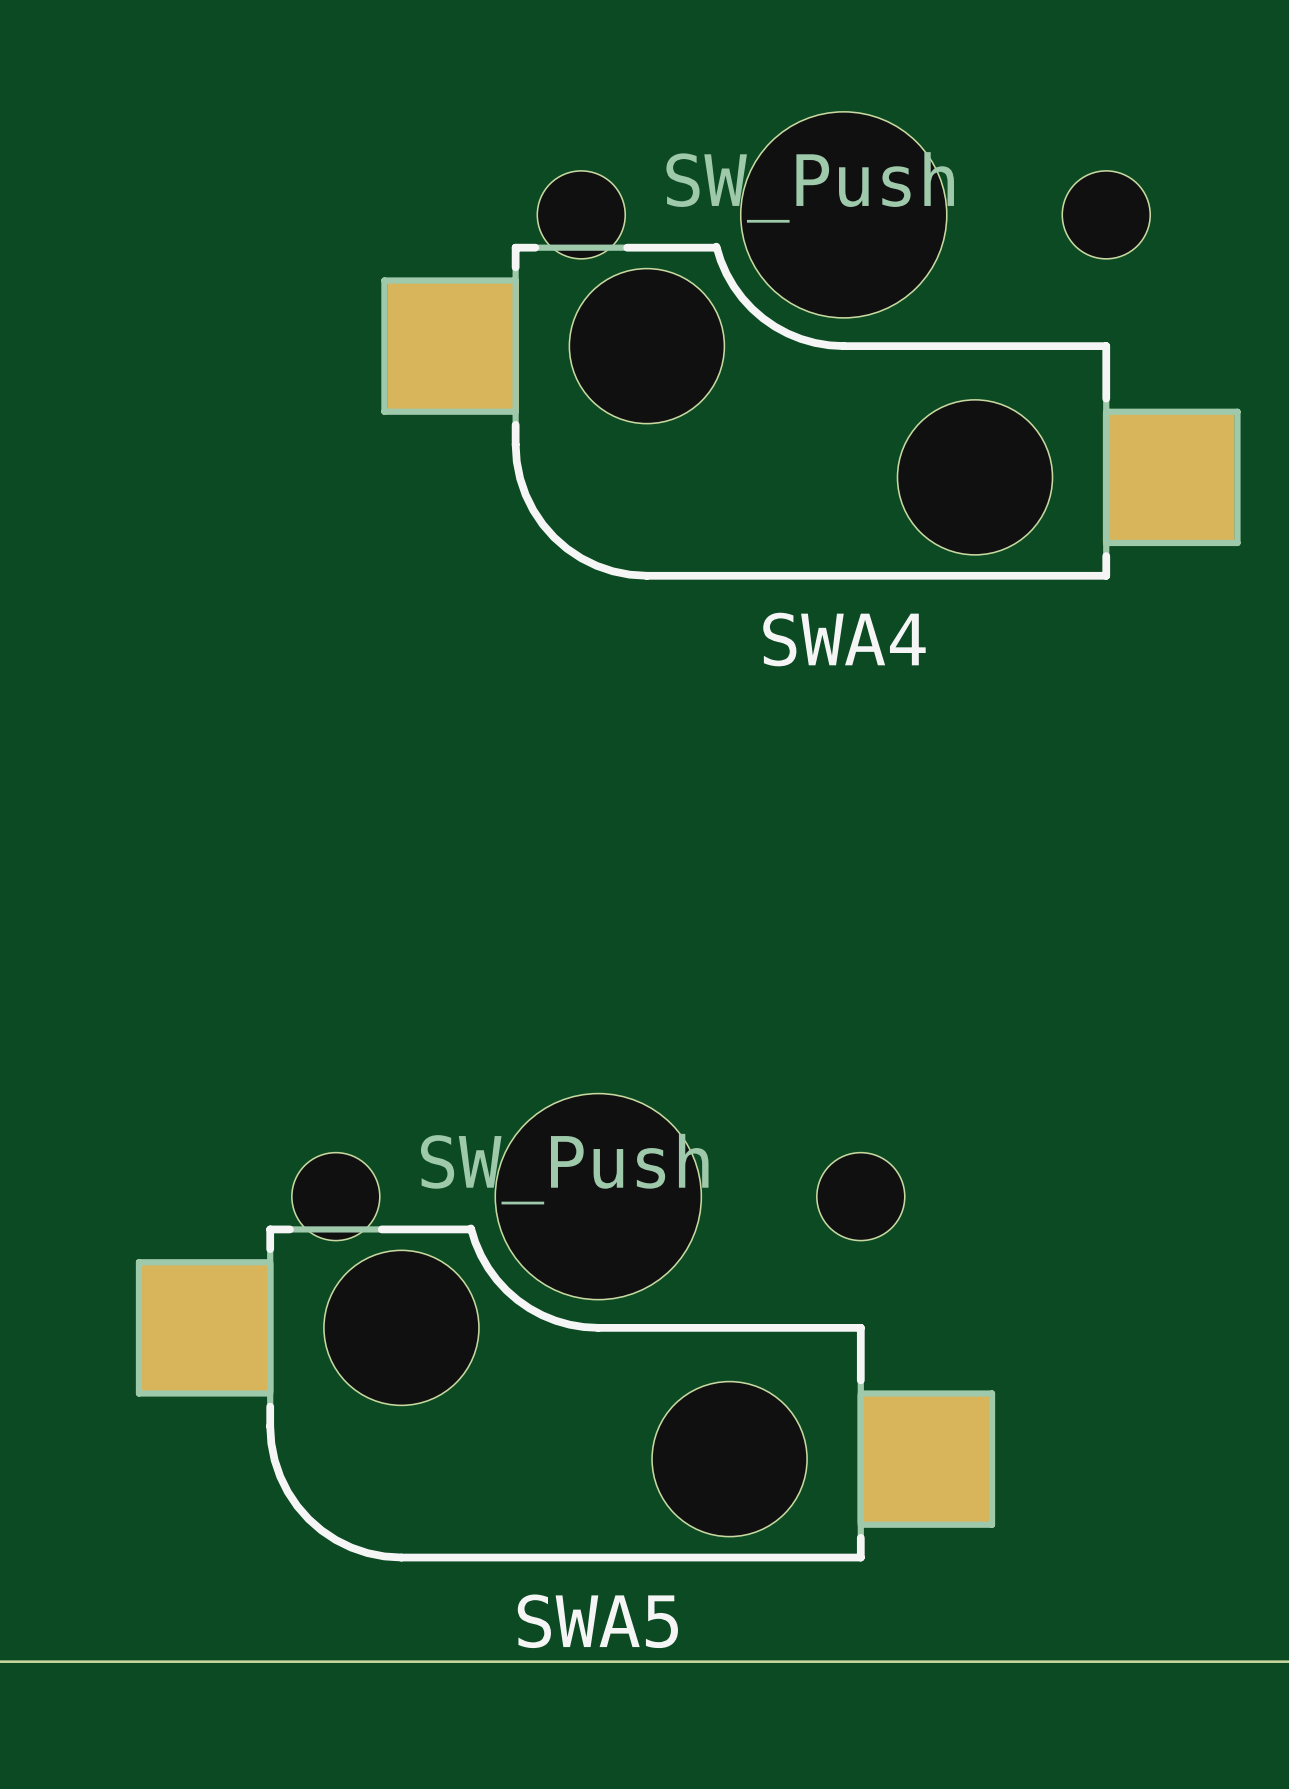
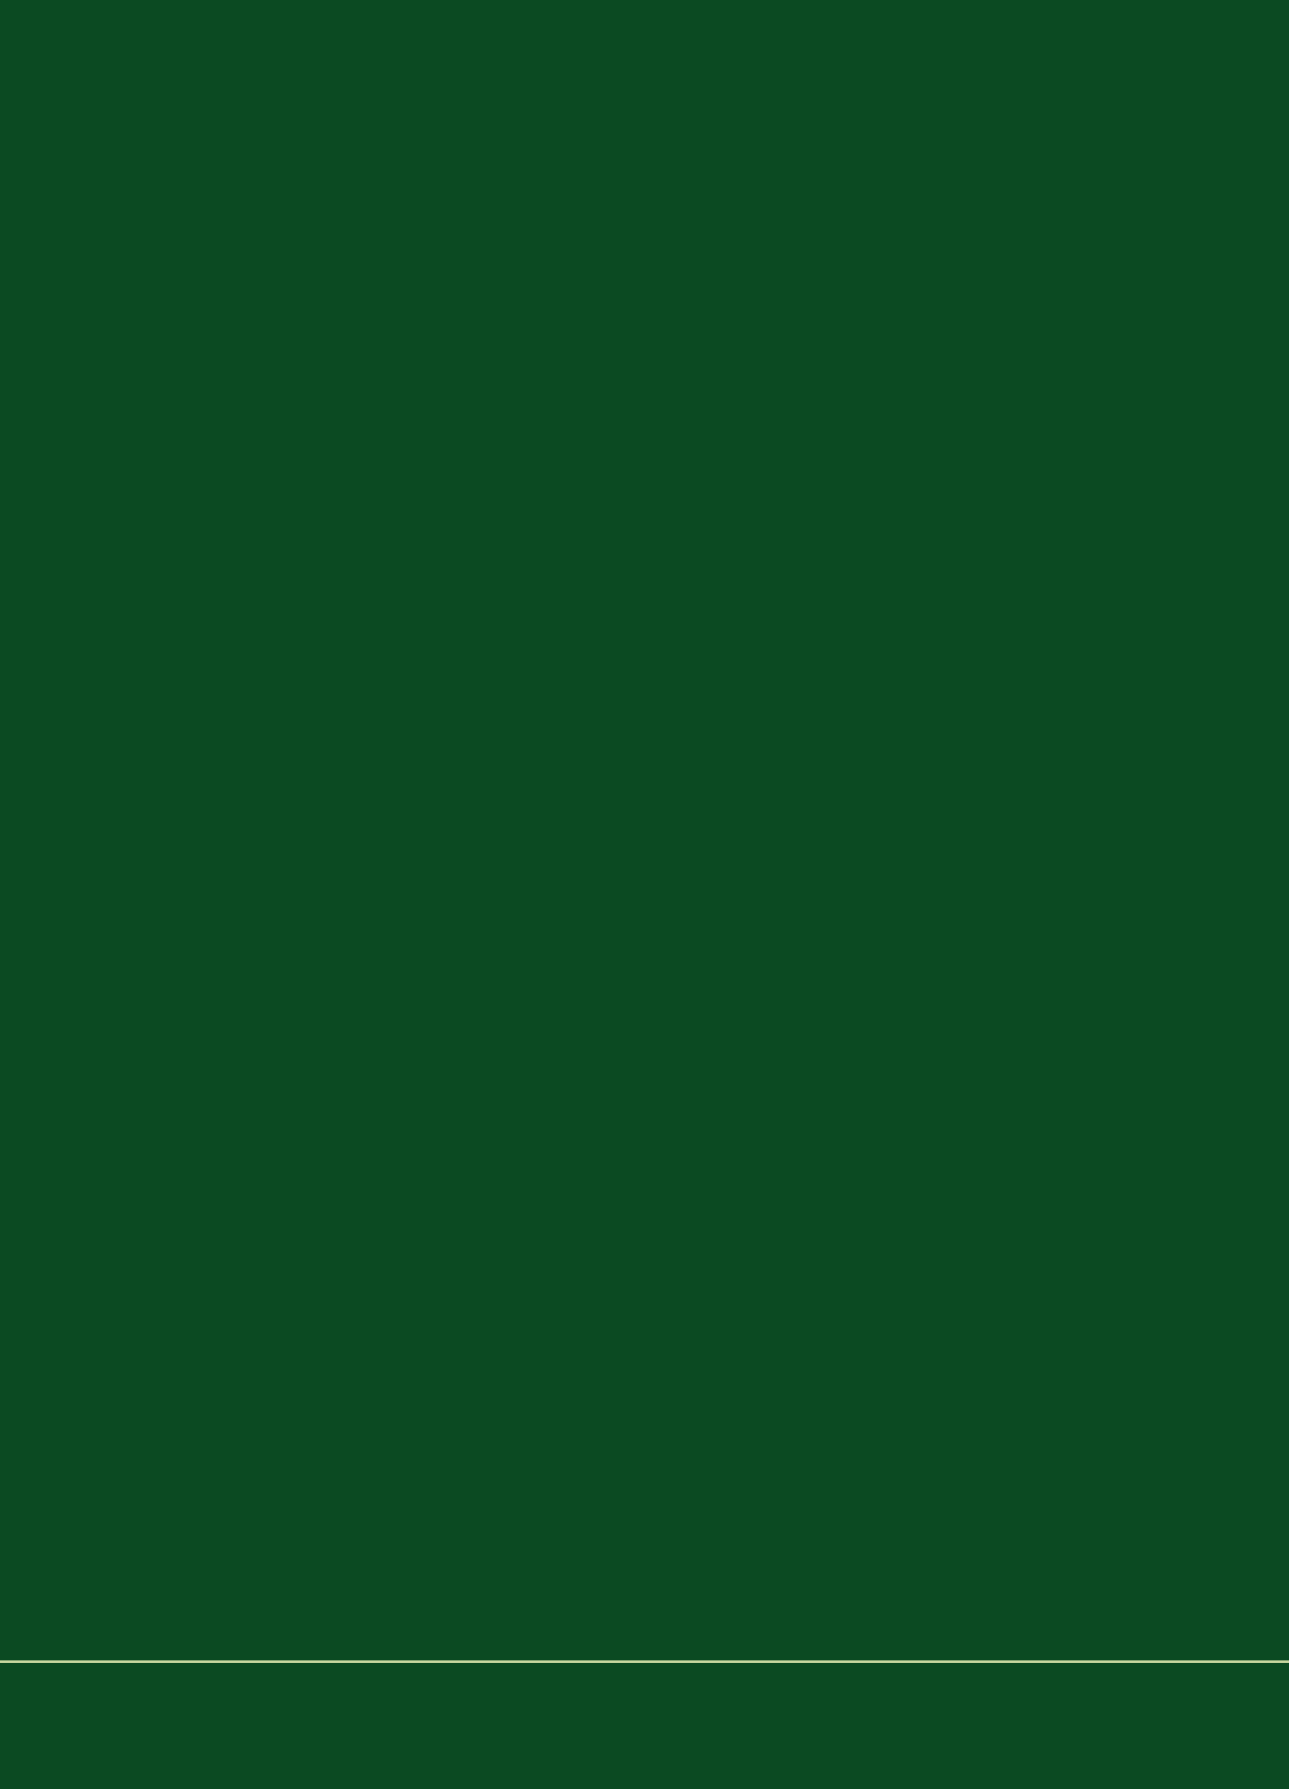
SWA4: SW_Push (810, 345) -> none
SWA5: SW_Push (565, 1327) -> none

